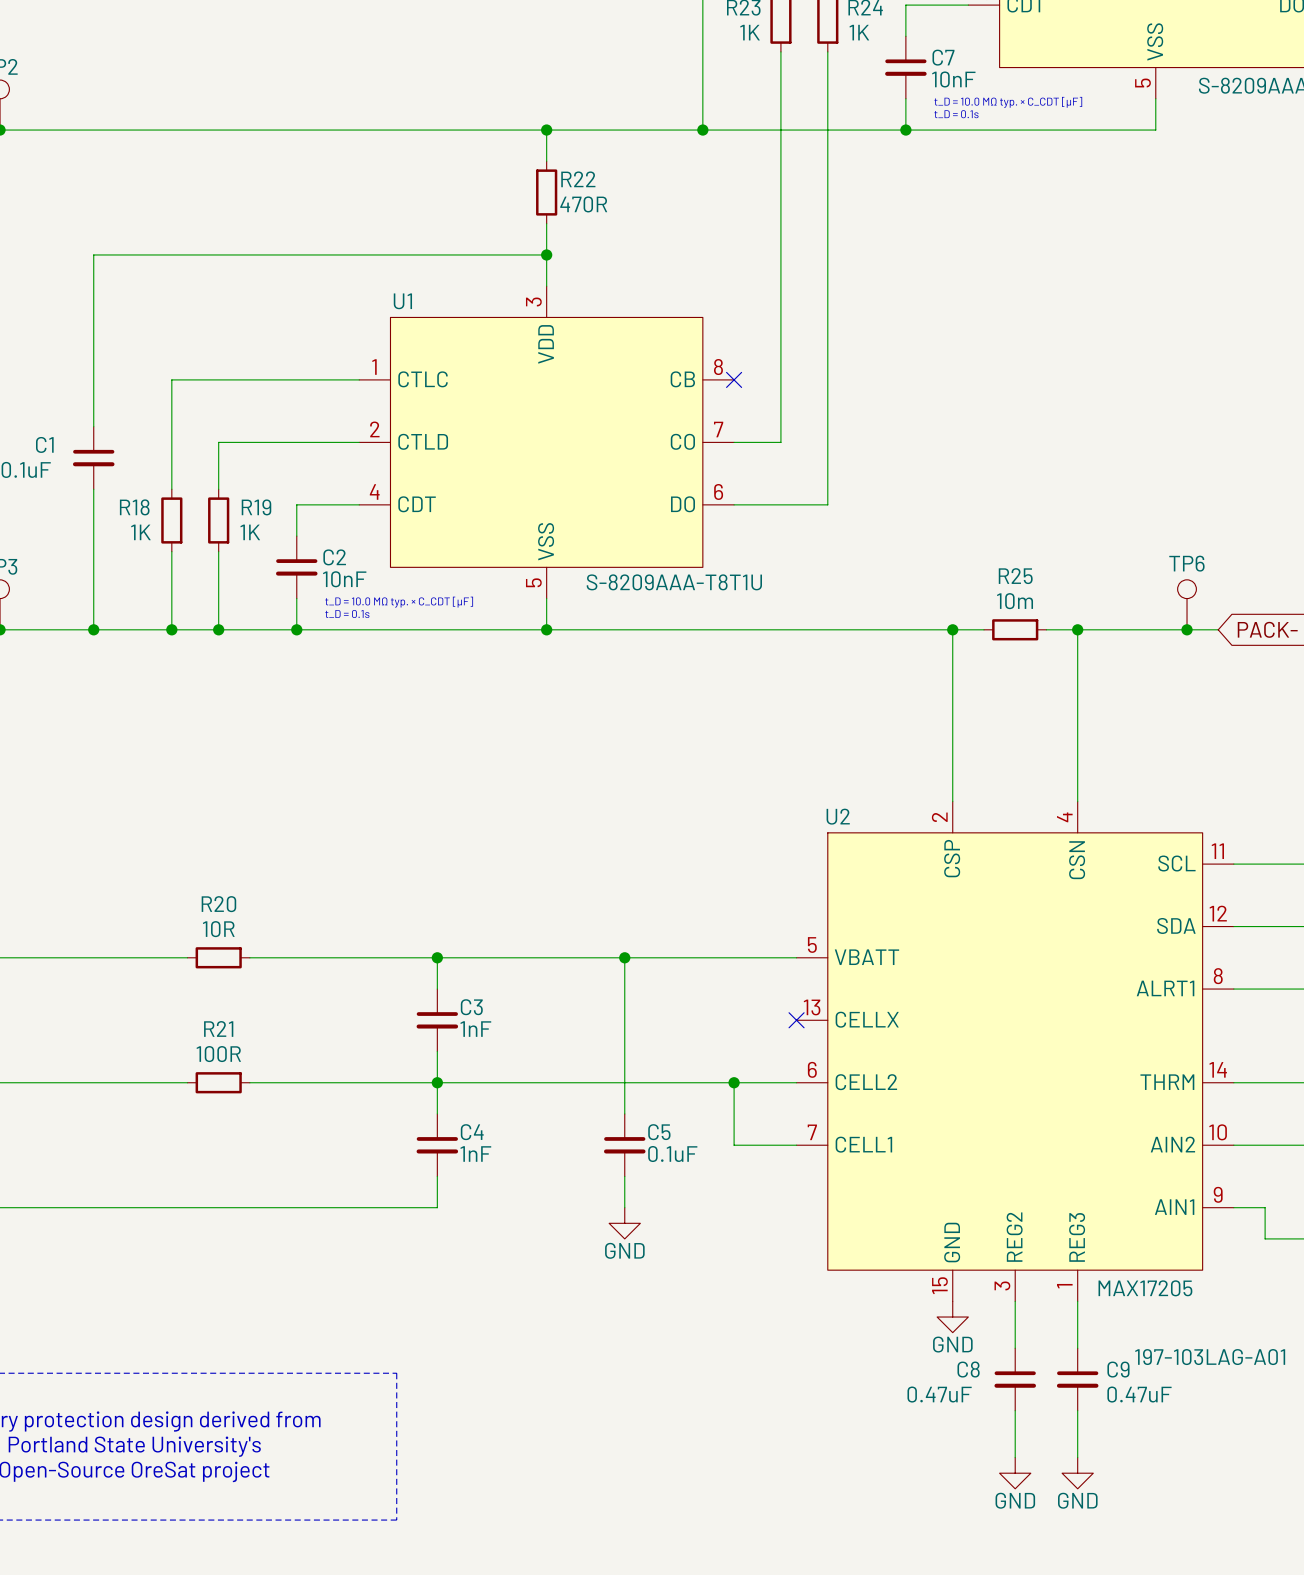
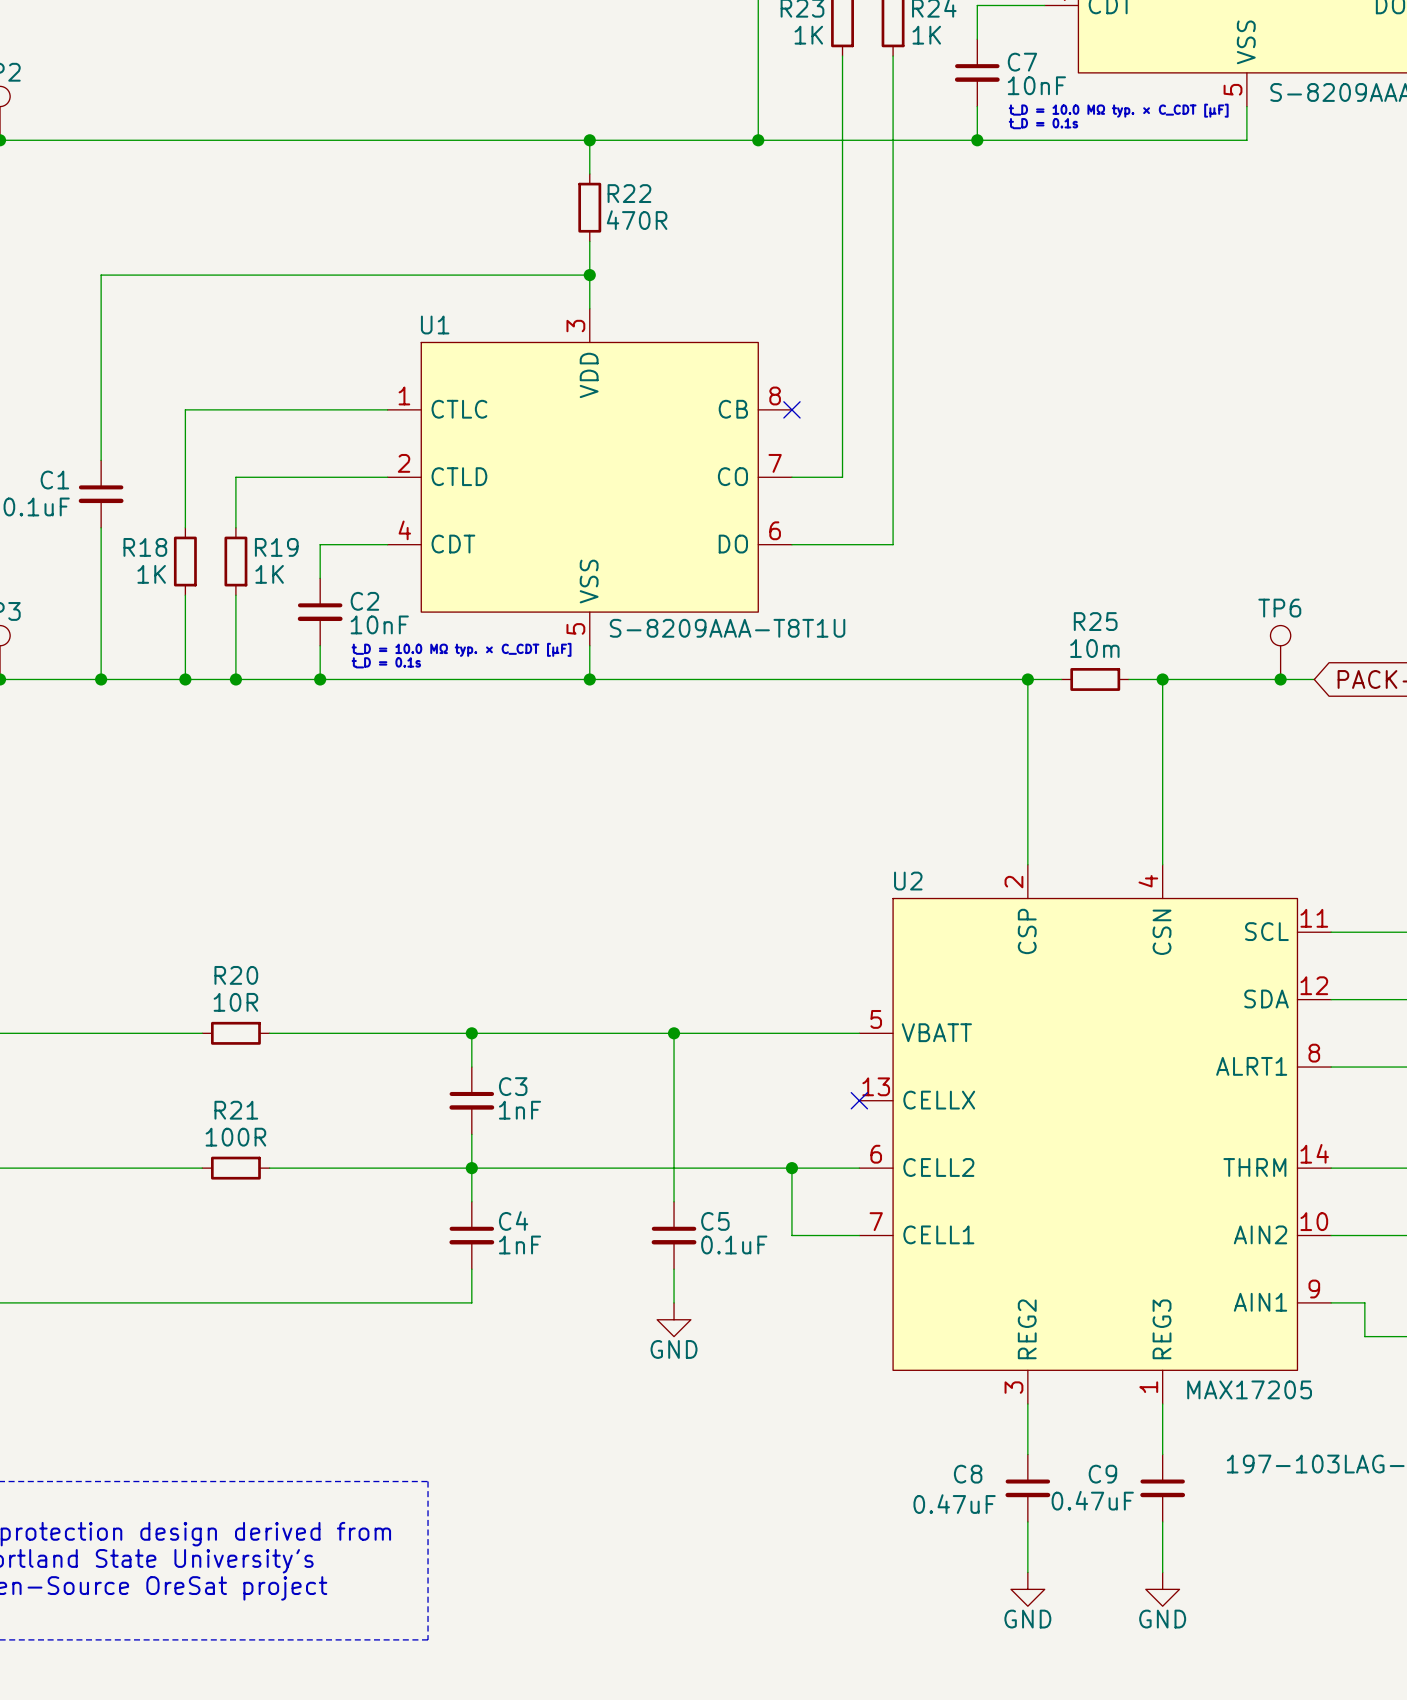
U2 symbol: [796, 801, 1234, 1302] -> [859, 864, 1332, 1405]
wire: (1015, 1301) (1015, 1348) -> (1027, 1404) (1027, 1454)
power symbol: GND (952, 1317) -> none
C8 name position: C8 (968, 1369) -> C8 (968, 1474)
C9 name position: C9 (1118, 1369) -> C9 (1102, 1474)
C8 position: (1015, 1379) -> (1027, 1488)
C9 value position: 0.47uF (1139, 1394) -> 0.47uF (1092, 1500)
wire: (1015, 1410) (1015, 1457) -> (1027, 1521) (1027, 1572)
power symbol position: GND (1015, 1473) -> GND (1027, 1589)

